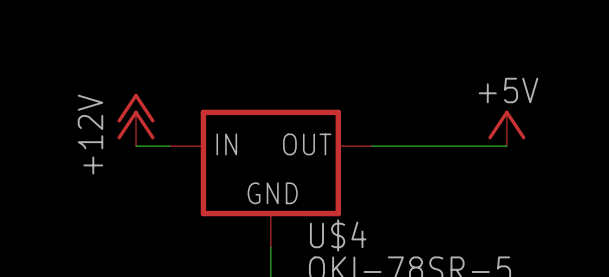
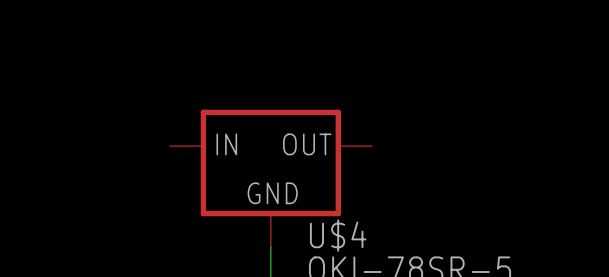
power symbol: +12V (136, 119) -> none
power symbol: +5V (506, 128) -> none
wire: (136, 146) (169, 146) -> none
wire: (372, 146) (506, 146) -> none

